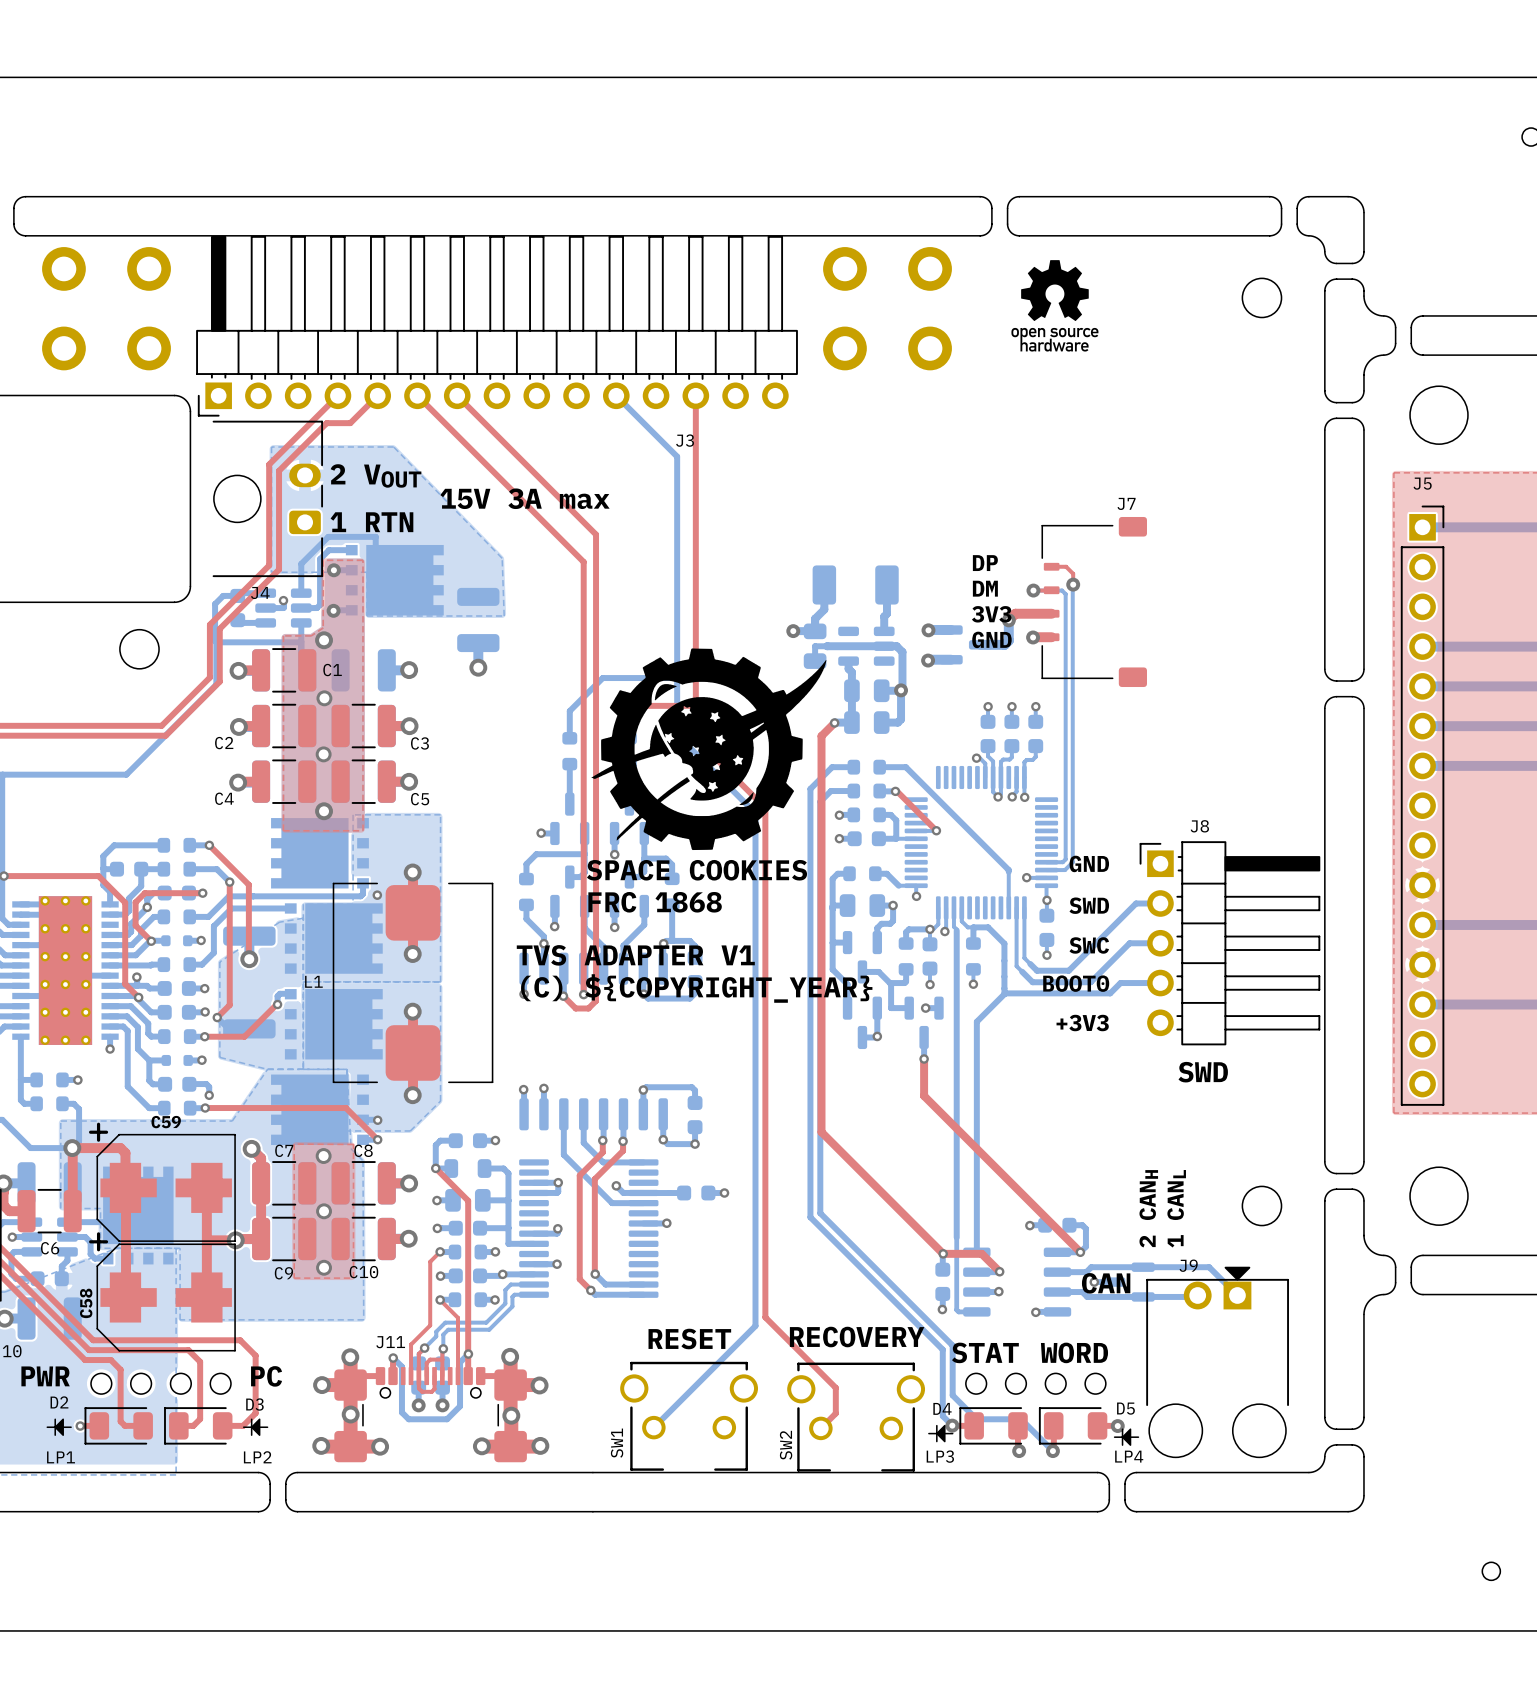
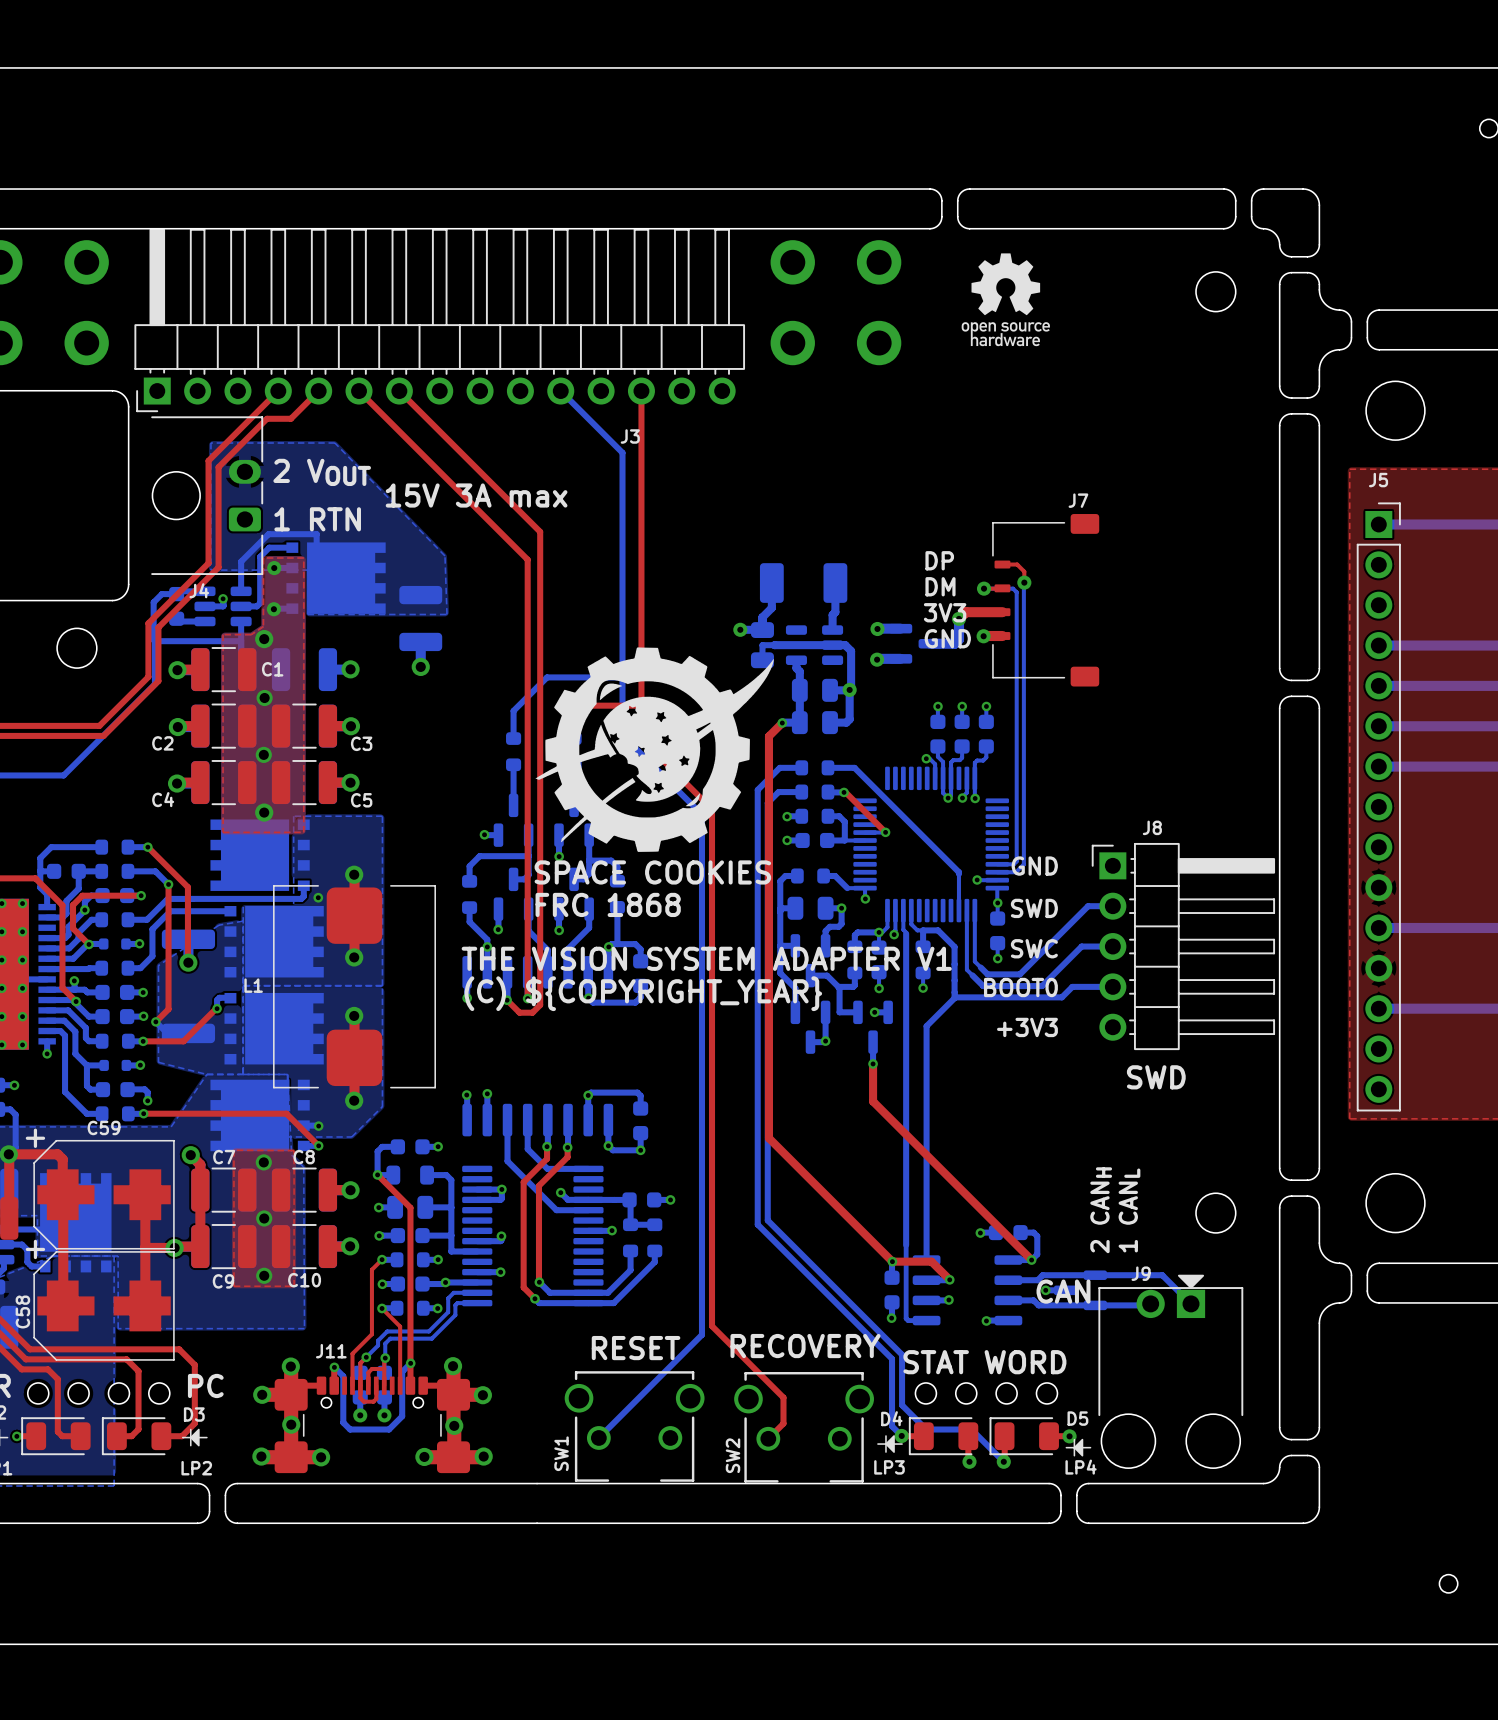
text: TVS ADAPTER V1 (635, 955) -> THE VISION SYSTEM ADAPTER V1 (706, 958)
bottom track: none -> (629, 1199) (630, 1224) (654, 1224)
part: none -> (630, 1237)
part: none -> (654, 1237)
bottom track: none -> (630, 1250) (630, 1270) (607, 1292) (588, 1292)
bottom track: none -> (654, 1250) (654, 1262) (613, 1303) (588, 1303)

